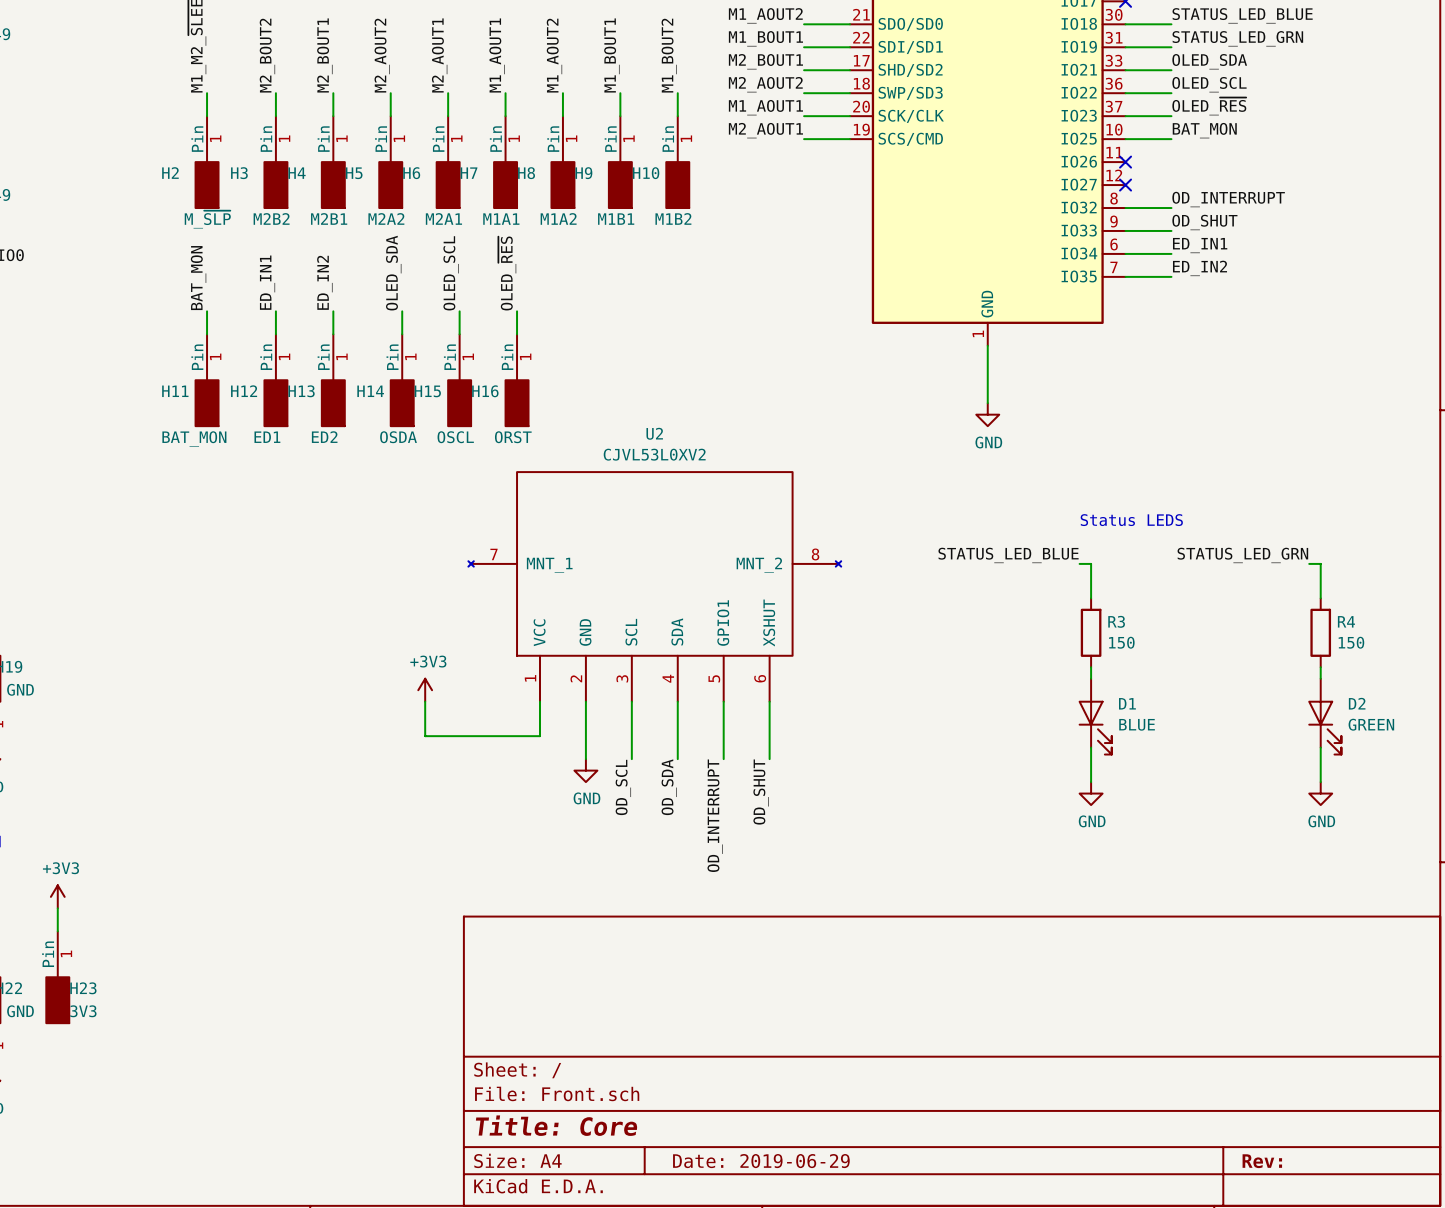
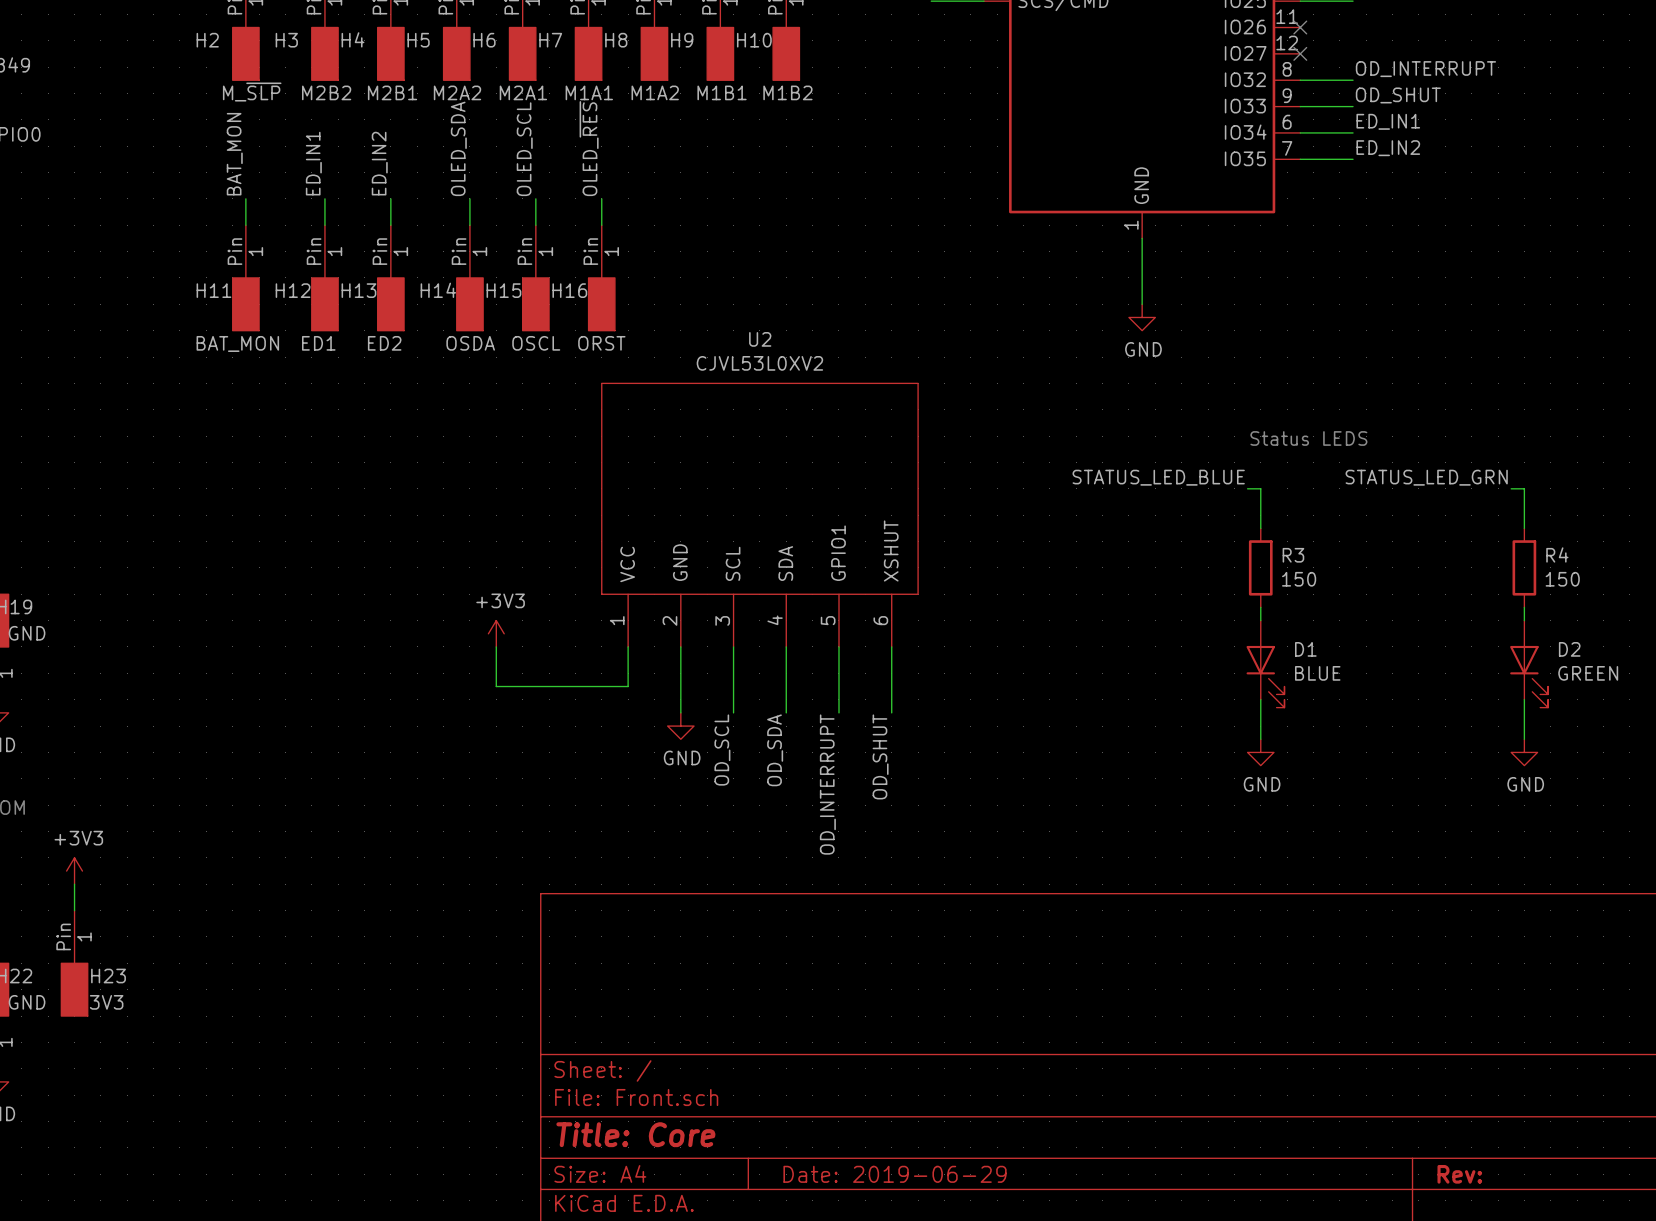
U2 symbol: [468, 472, 842, 702] -> [601, 383, 919, 647]

